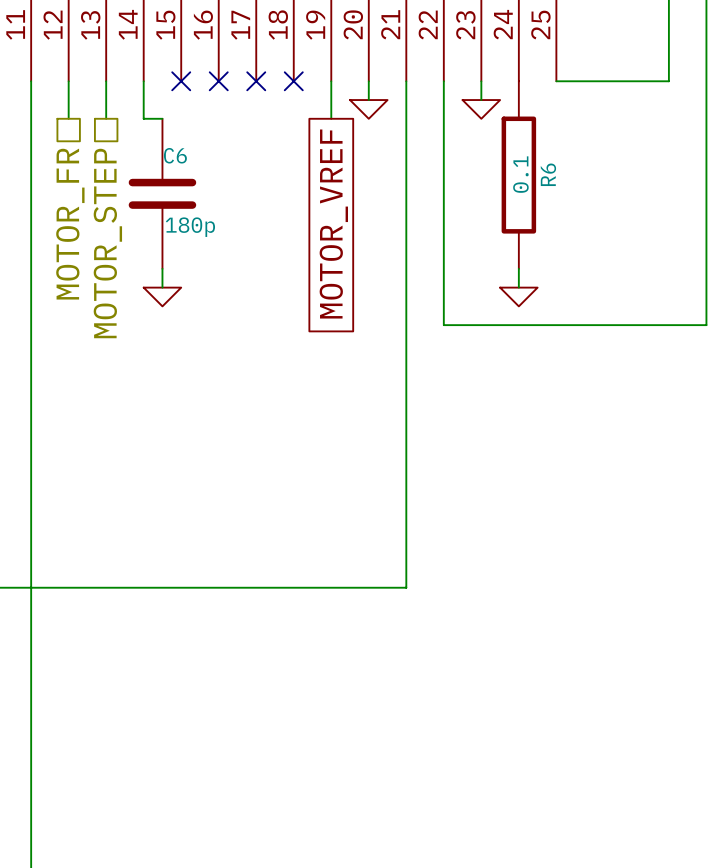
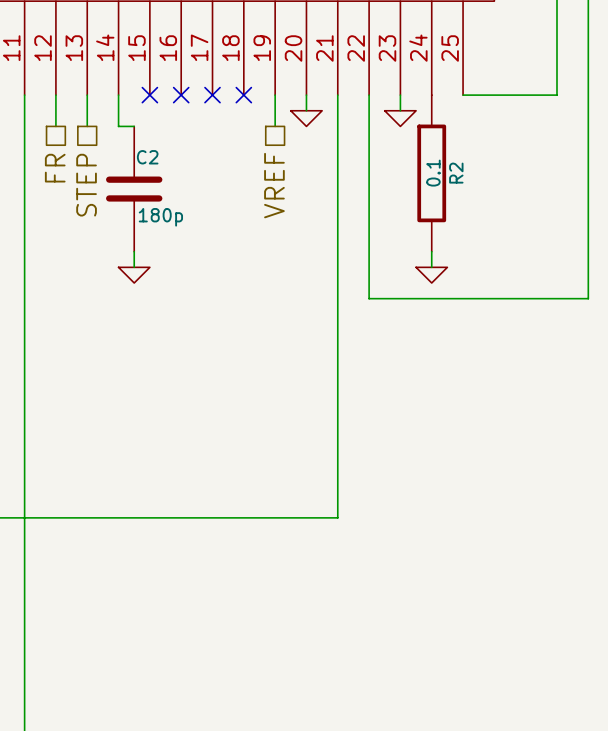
C6 name: C6 (175, 155) -> C2 (147, 157)
R6 name: R6 (548, 174) -> R2 (456, 173)
hierarchical label: none -> VREF (274, 185)
hierarchical label: MOTOR_FR (70, 224) -> FR (55, 168)
global label: MOTOR_VREF (333, 224) -> none
hierarchical label: MOTOR_STEP (107, 243) -> STEP (86, 185)

